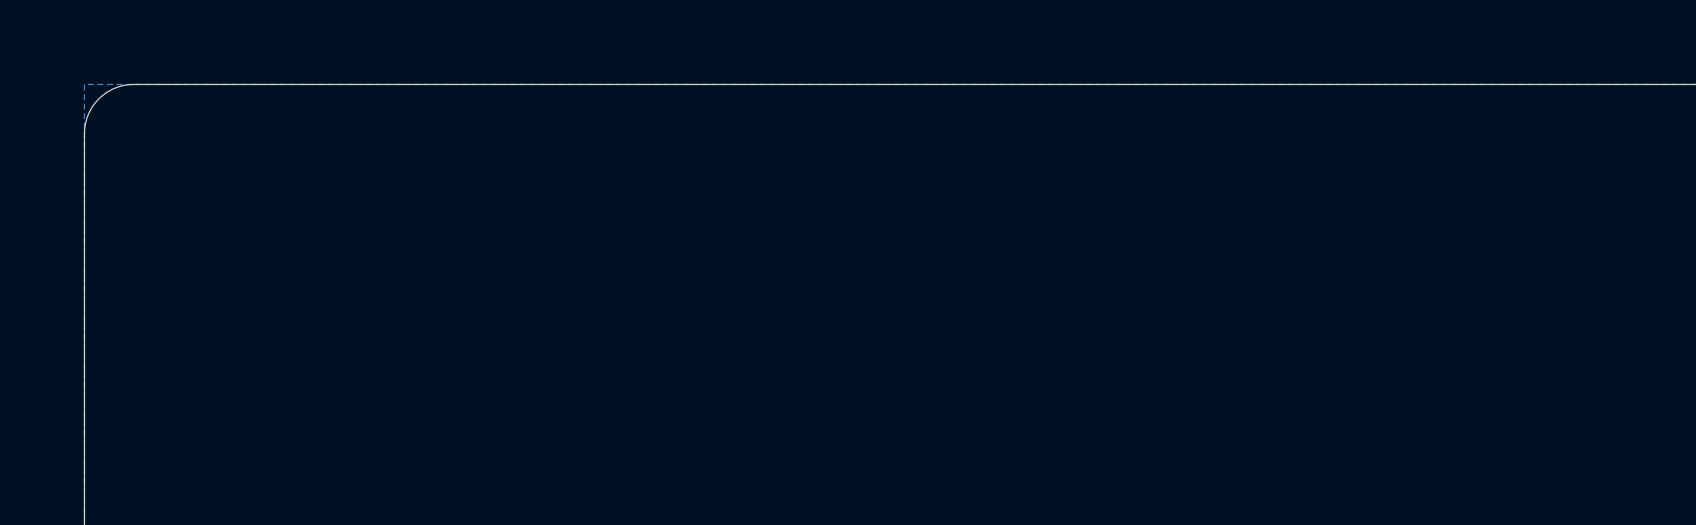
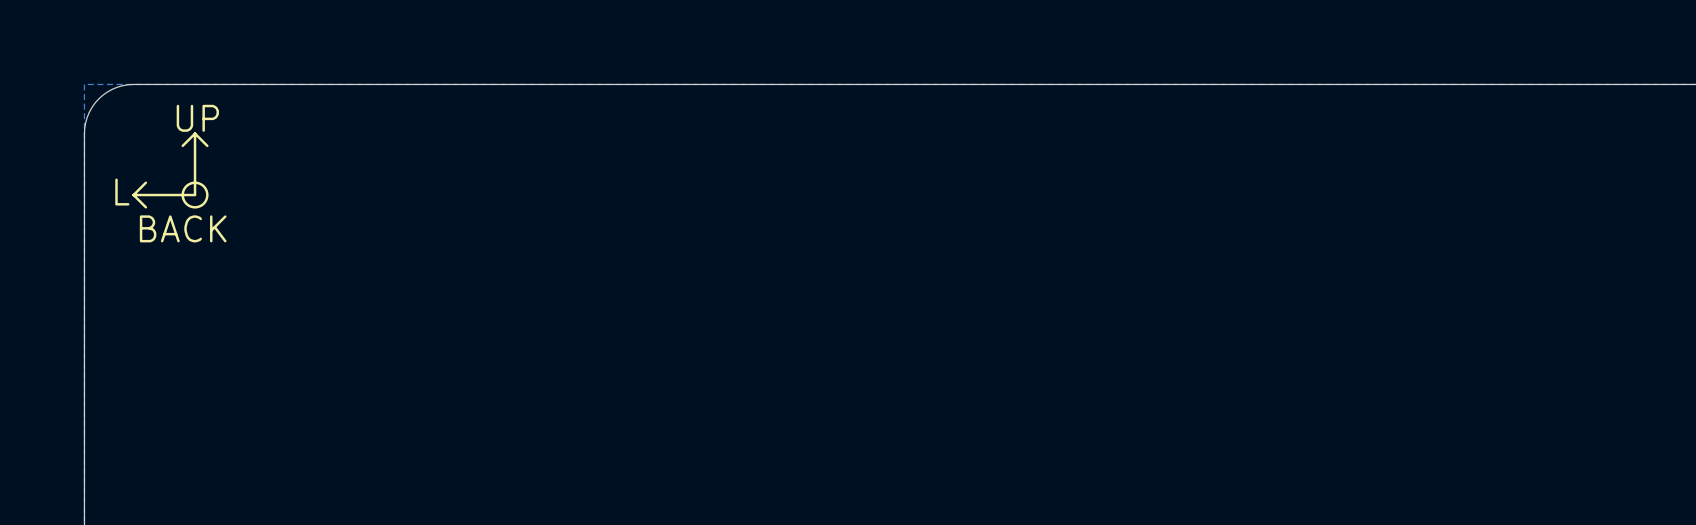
text: none -> UP (197, 118)
line: none -> (195, 133) (195, 195) (133, 195)
line: none -> (195, 133) (207, 145)
line: none -> (195, 133) (182, 145)
drawing: none -> [181, 181, 209, 209]
line: none -> (145, 182) (133, 195)
text: none -> L (122, 192)
line: none -> (133, 195) (145, 207)
text: none -> BACK (183, 228)

